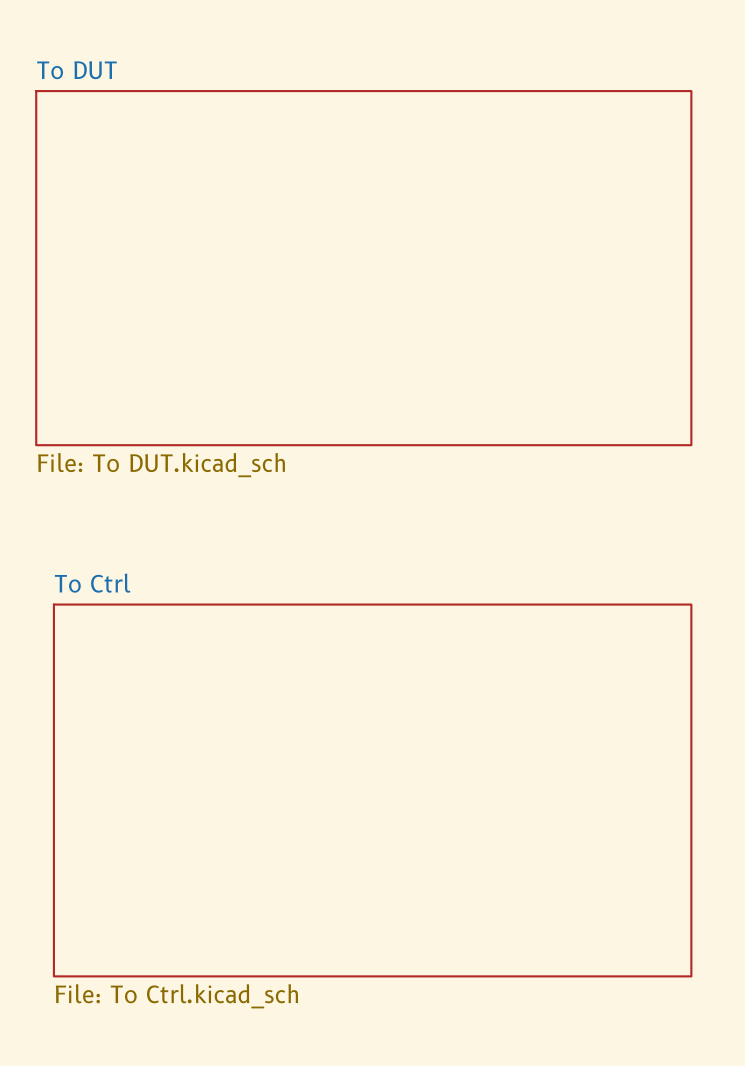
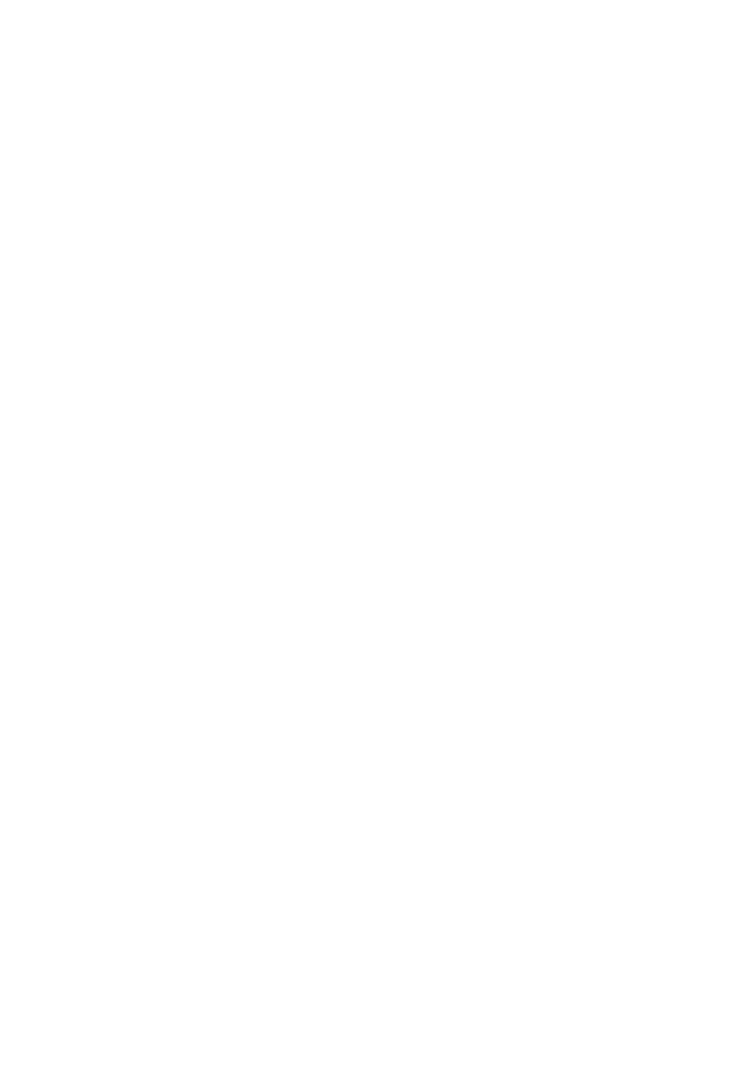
sheet To DUT: File: To DUT.kicad_sch (363, 268) -> none
sheet To Ctrl: File: To Ctrl.kicad_sch (372, 790) -> none

